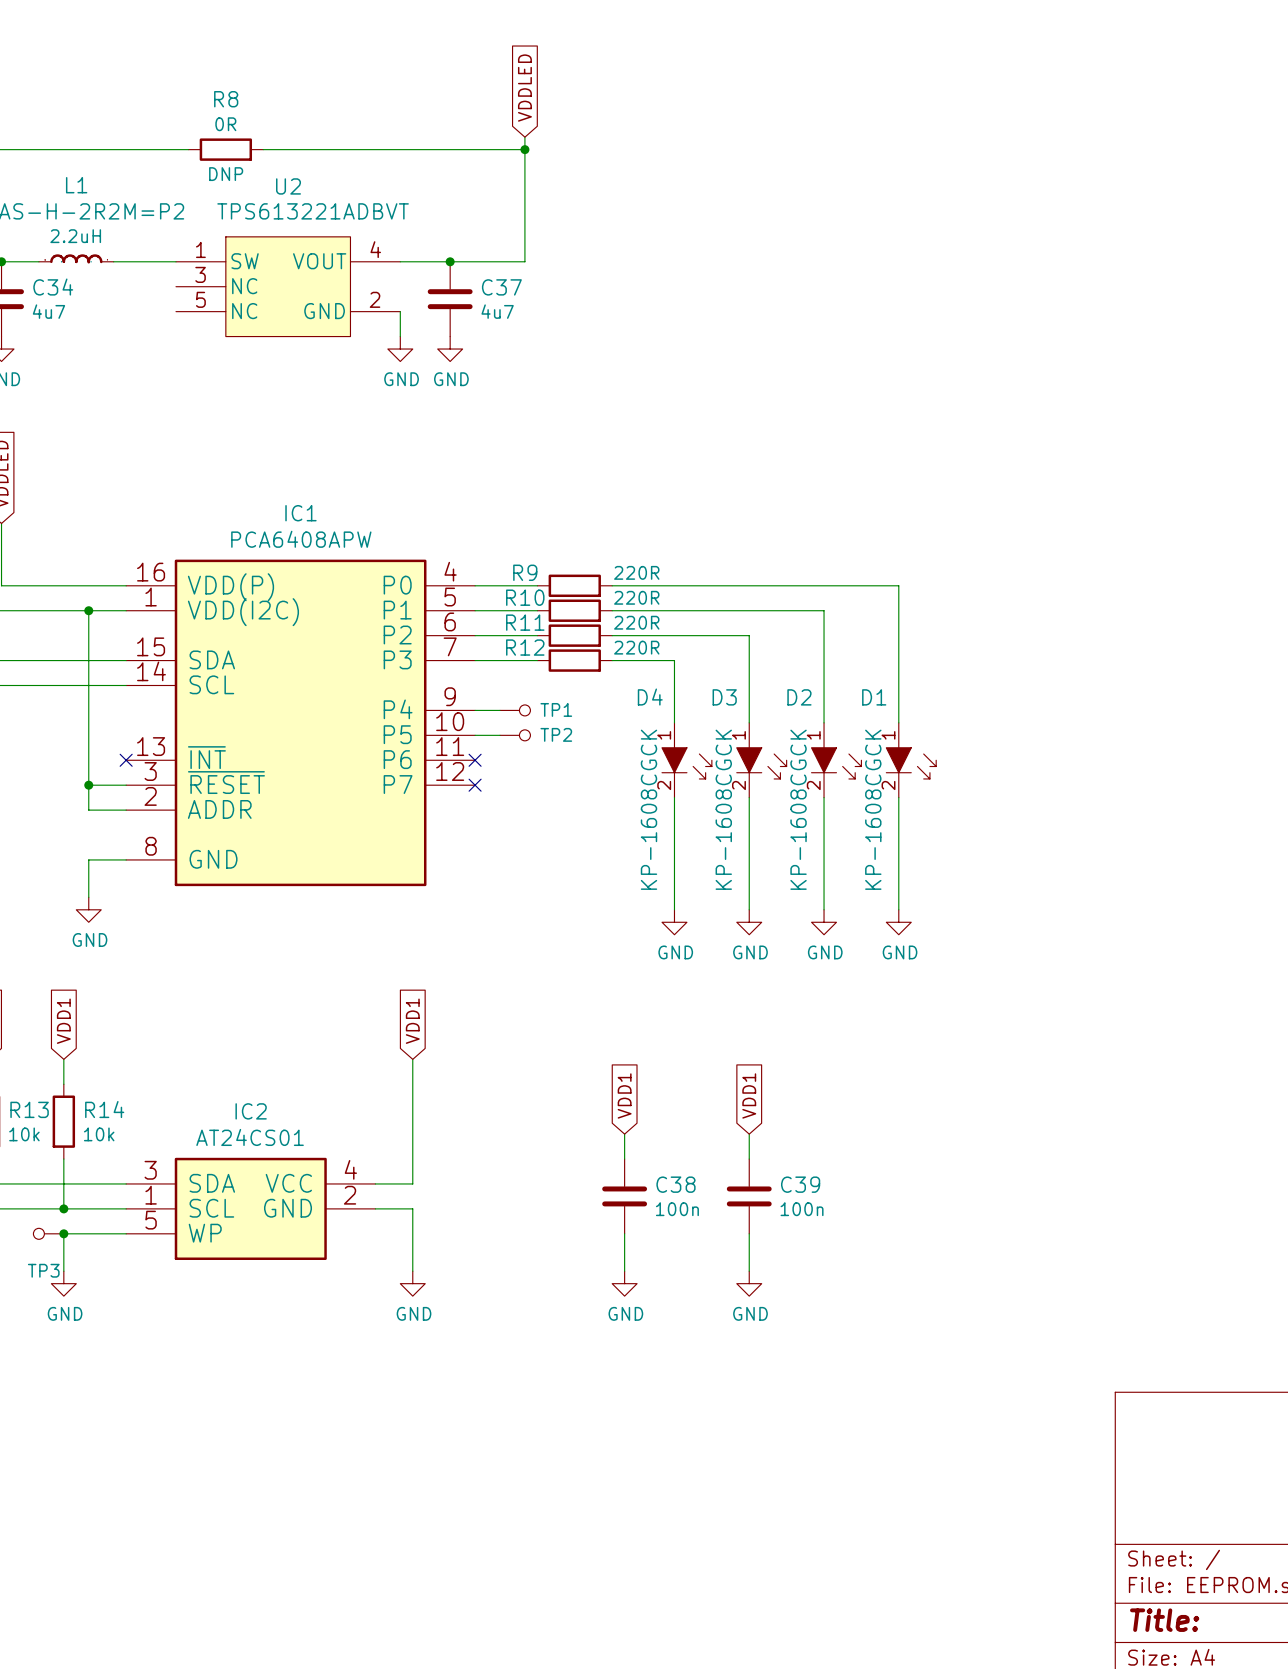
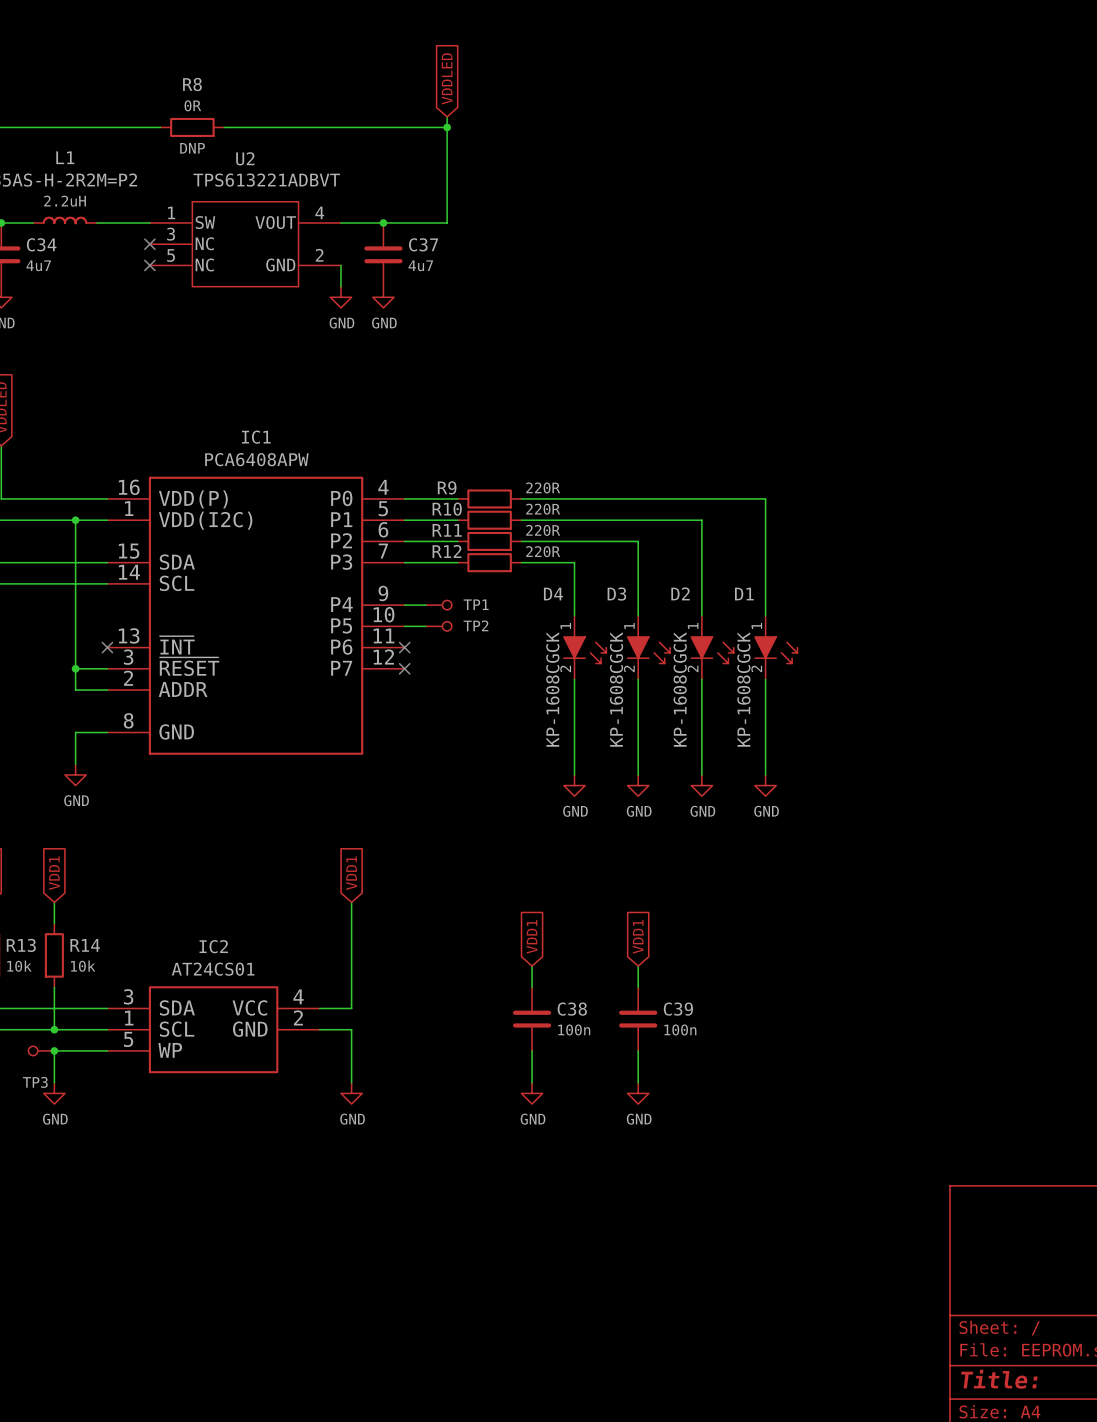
no-connect mark: none -> (149, 244)
no-connect mark: none -> (149, 265)

